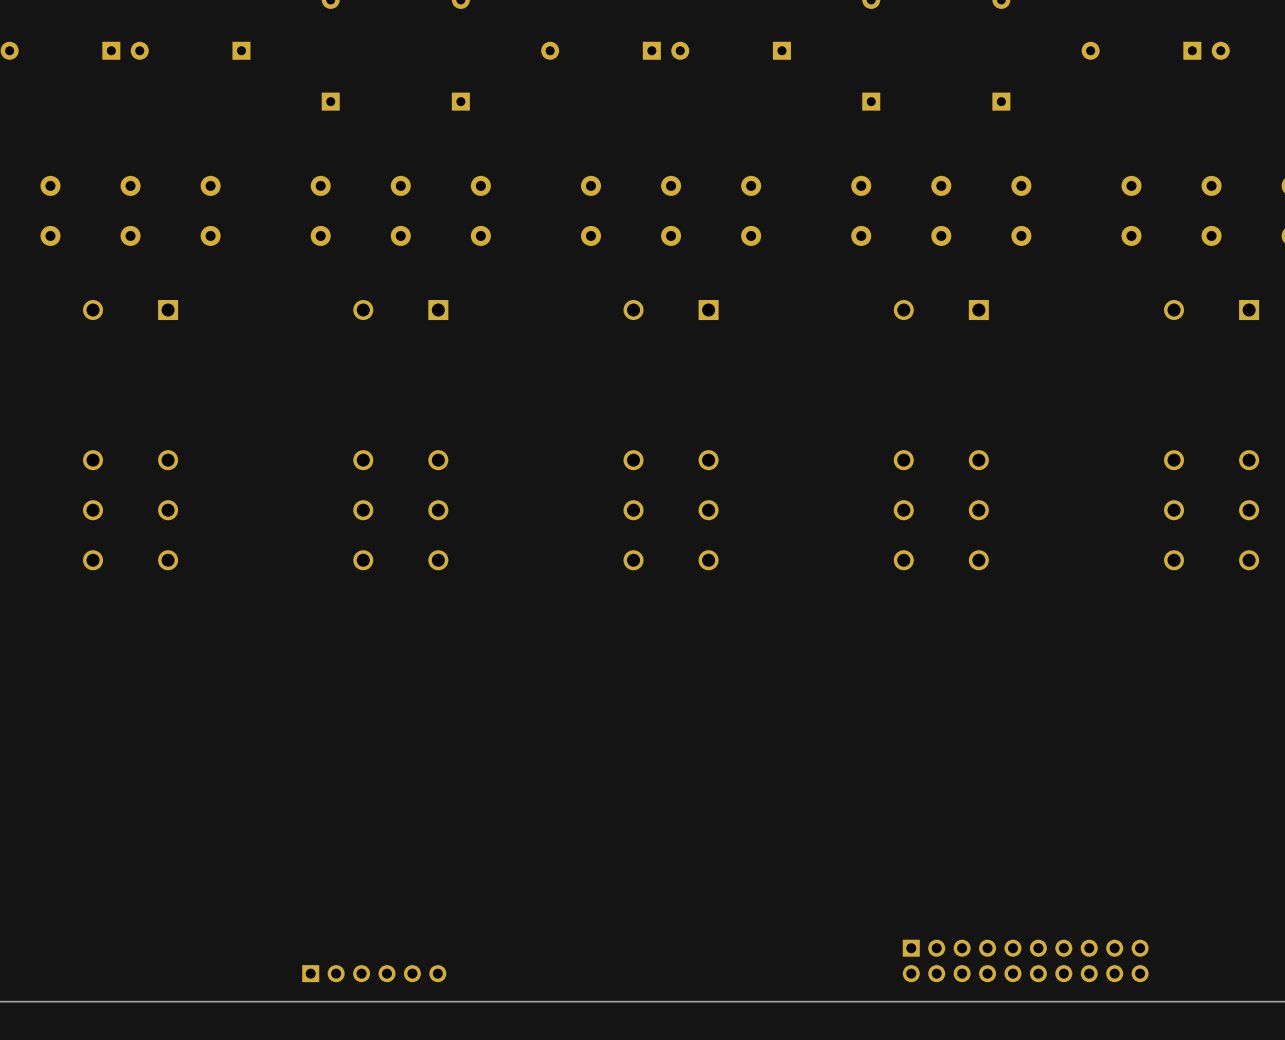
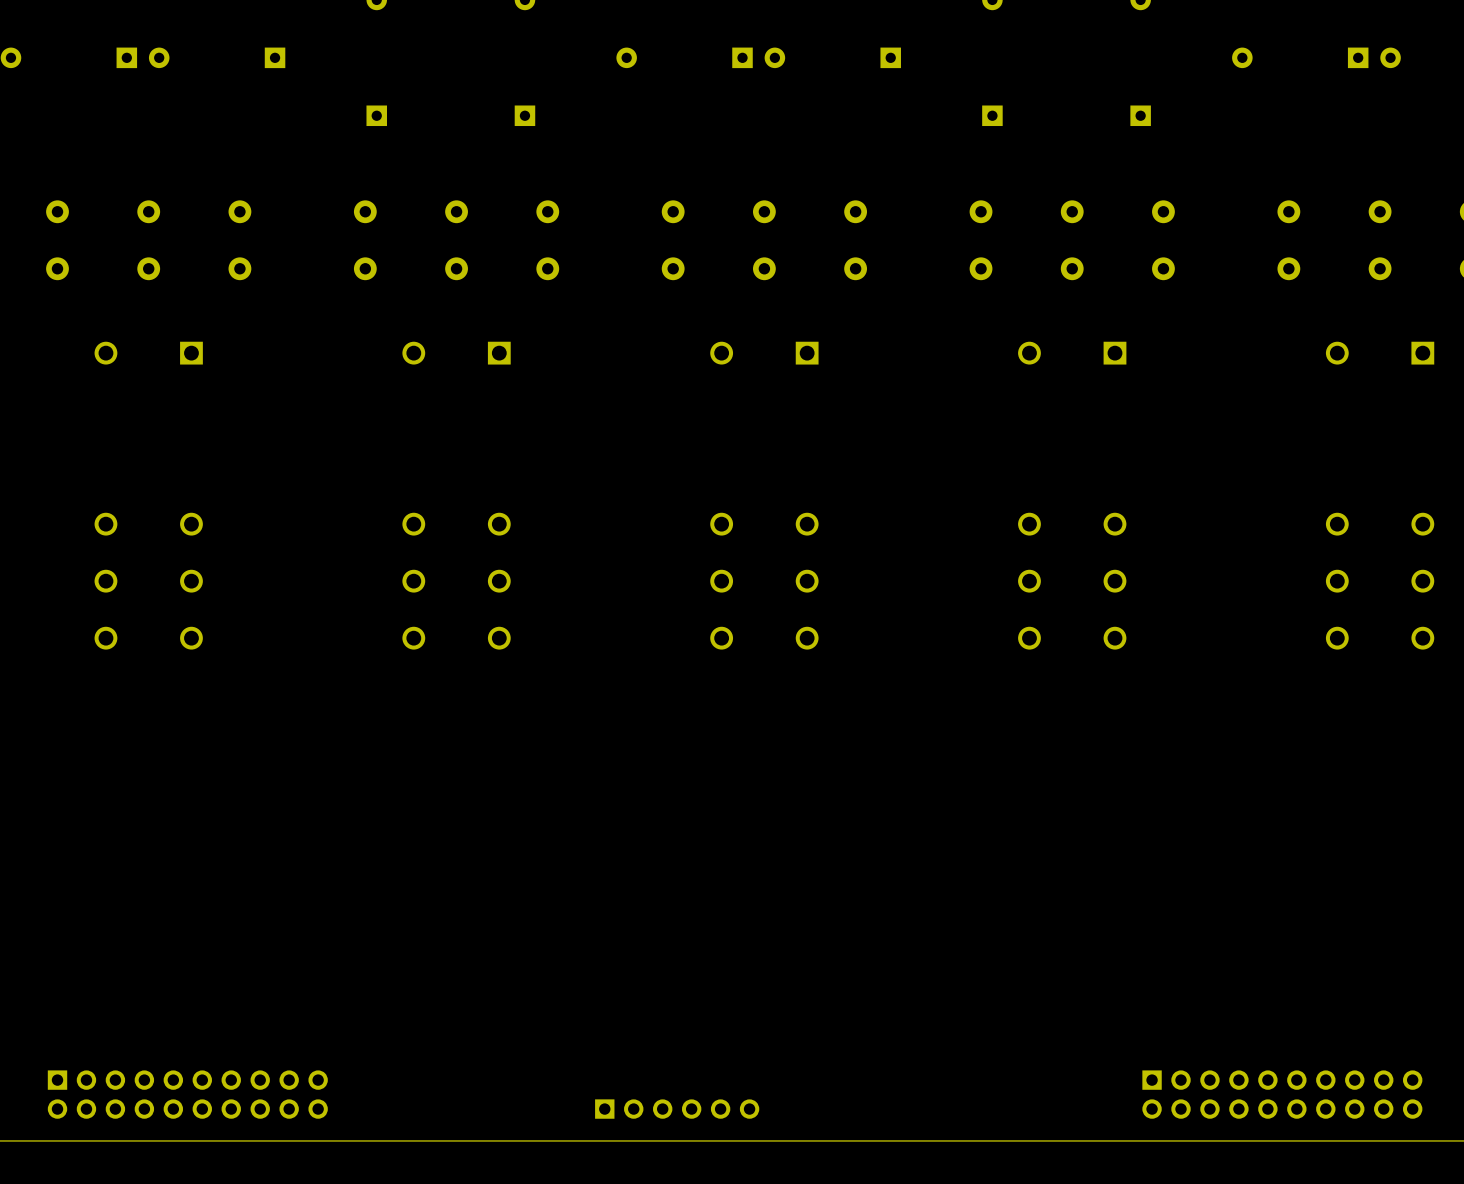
part: none -> (187, 1094)
part position: (1025, 960) -> (1282, 1094)
part position: (374, 973) -> (677, 1109)

